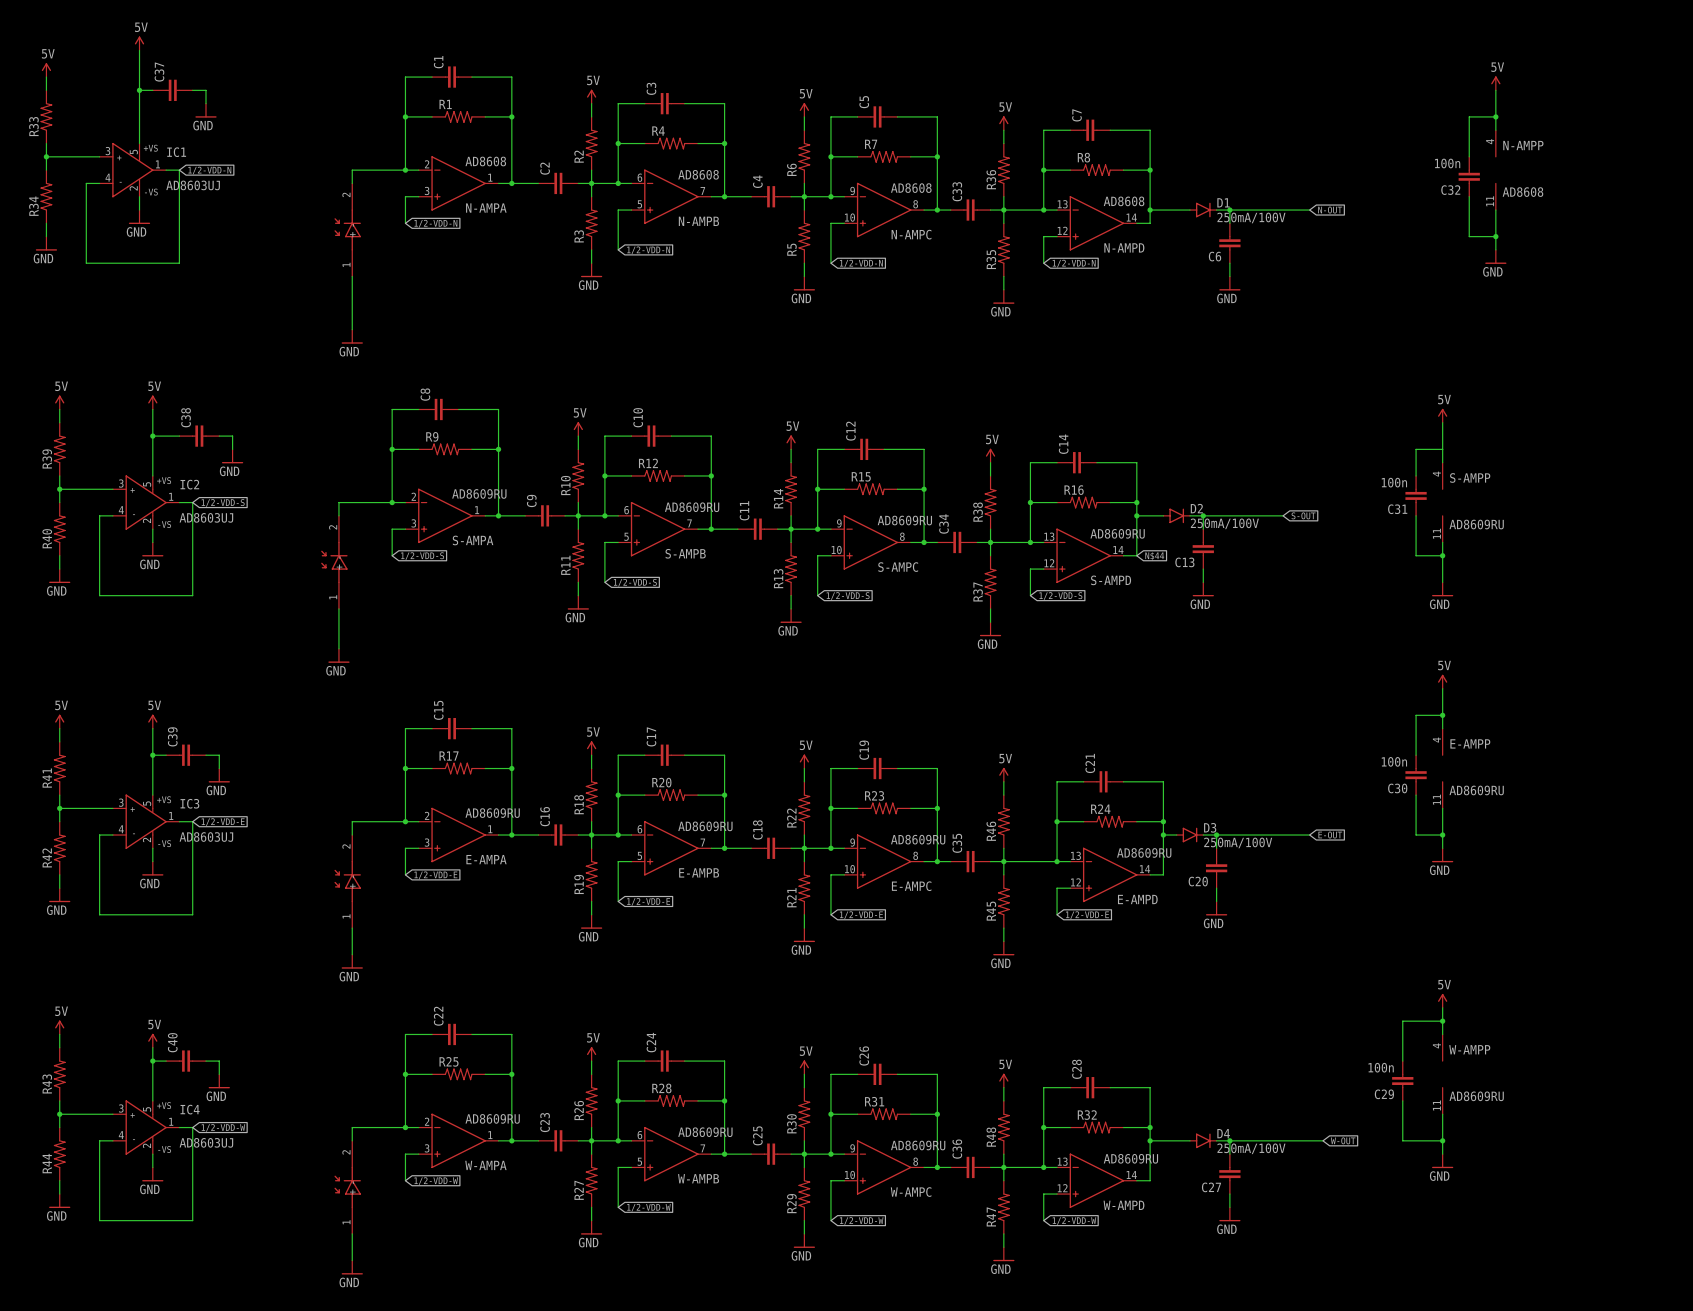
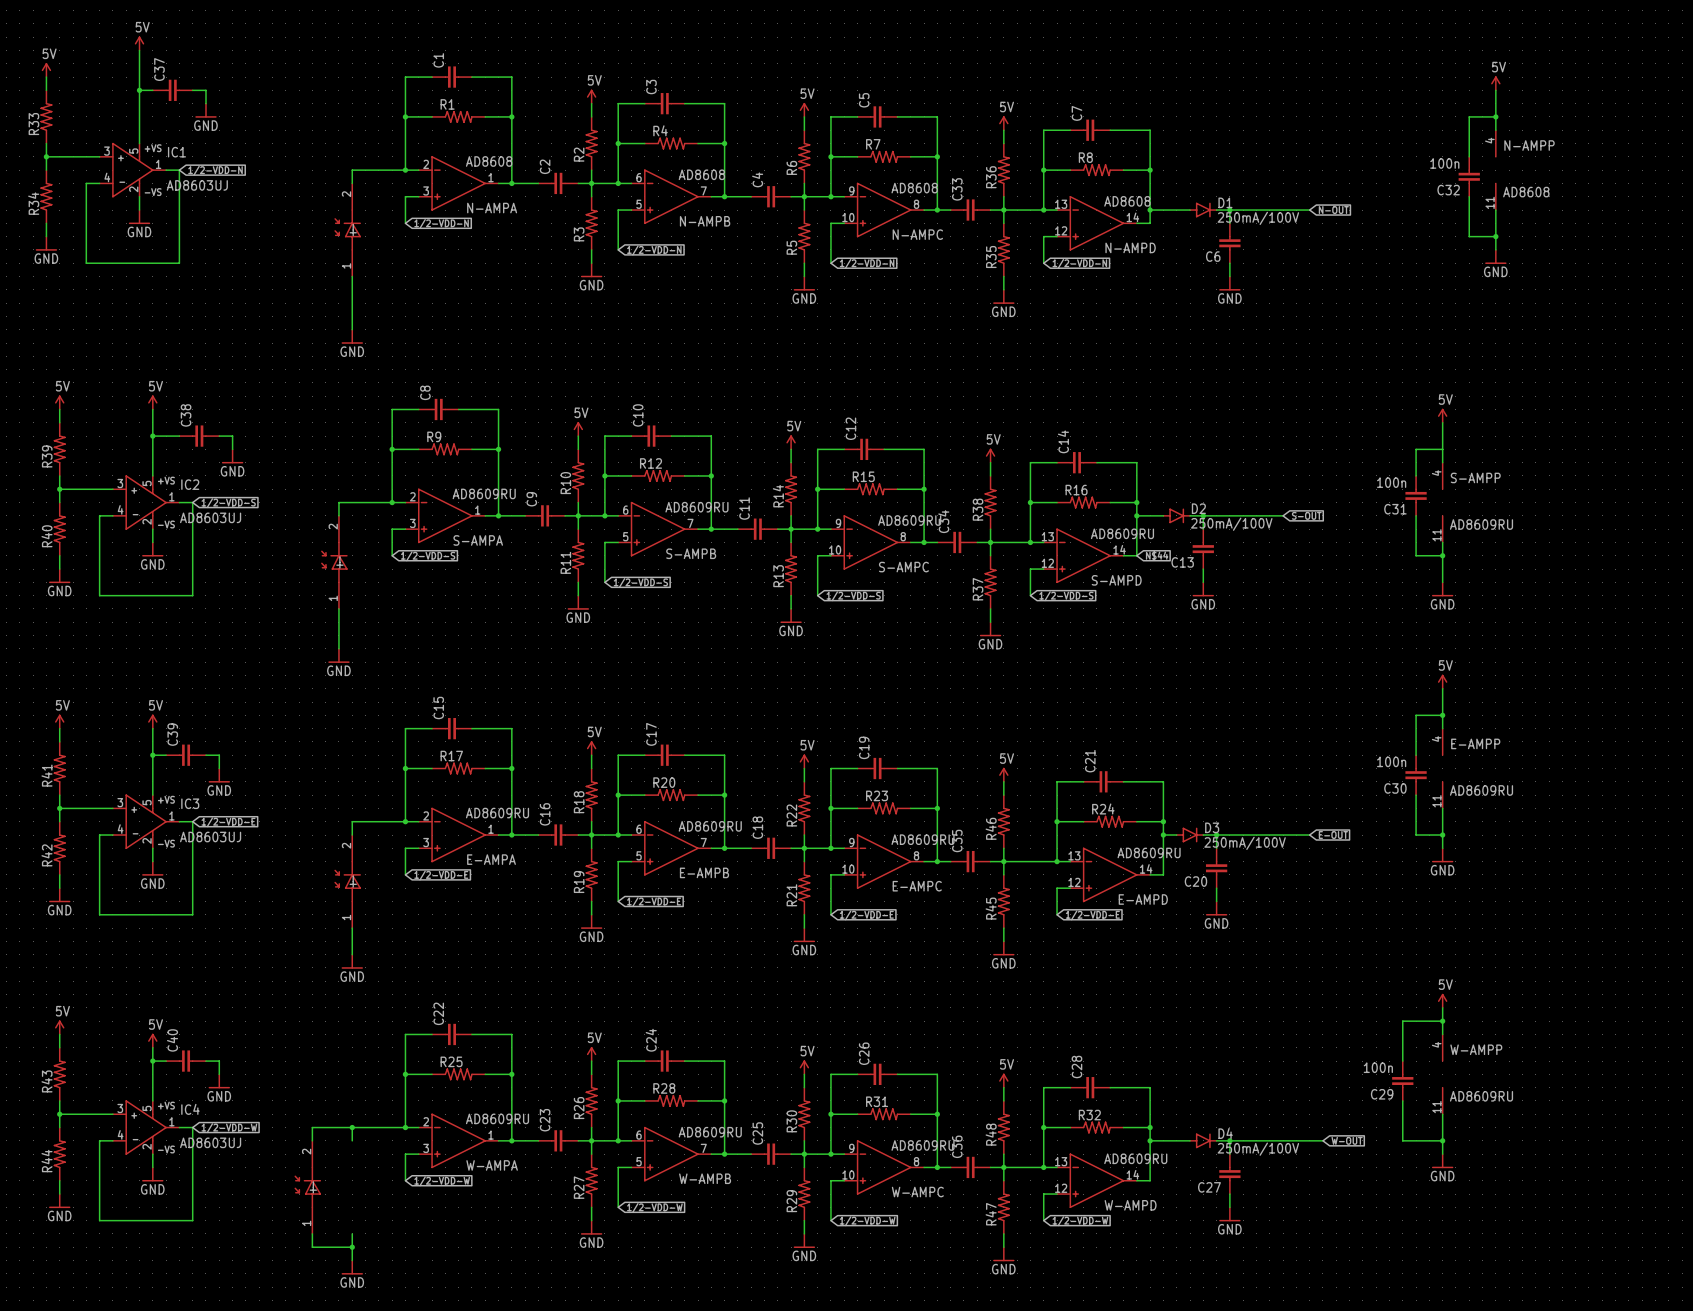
wire: none -> (352, 1127) (312, 1127) (312, 1140)
junction: none -> (352, 1127)
part position: (347, 1187) -> (307, 1187)
wire: none -> (312, 1233) (312, 1247) (352, 1247)
junction: none -> (352, 1247)

